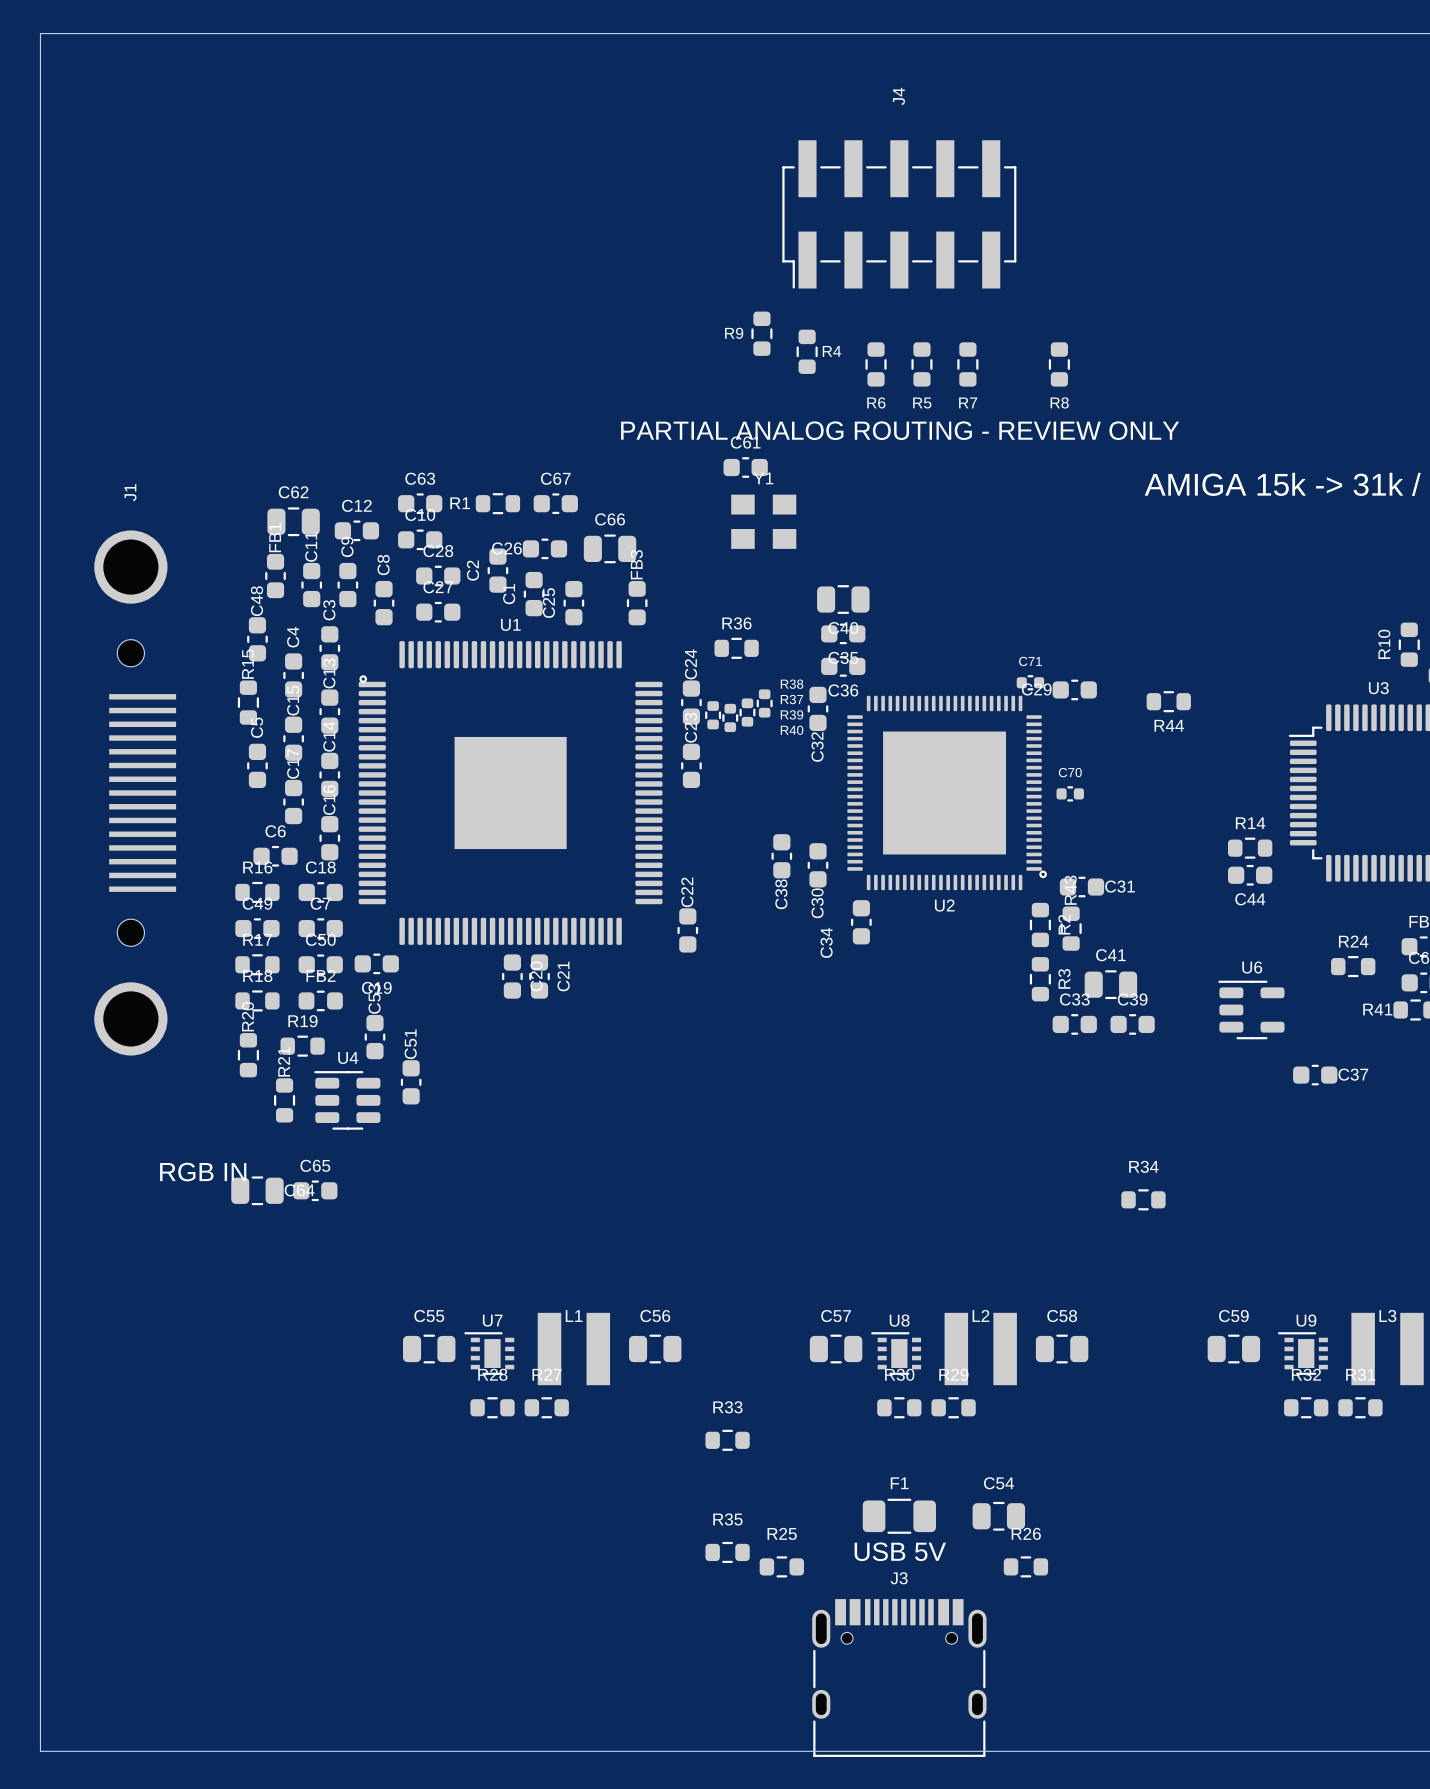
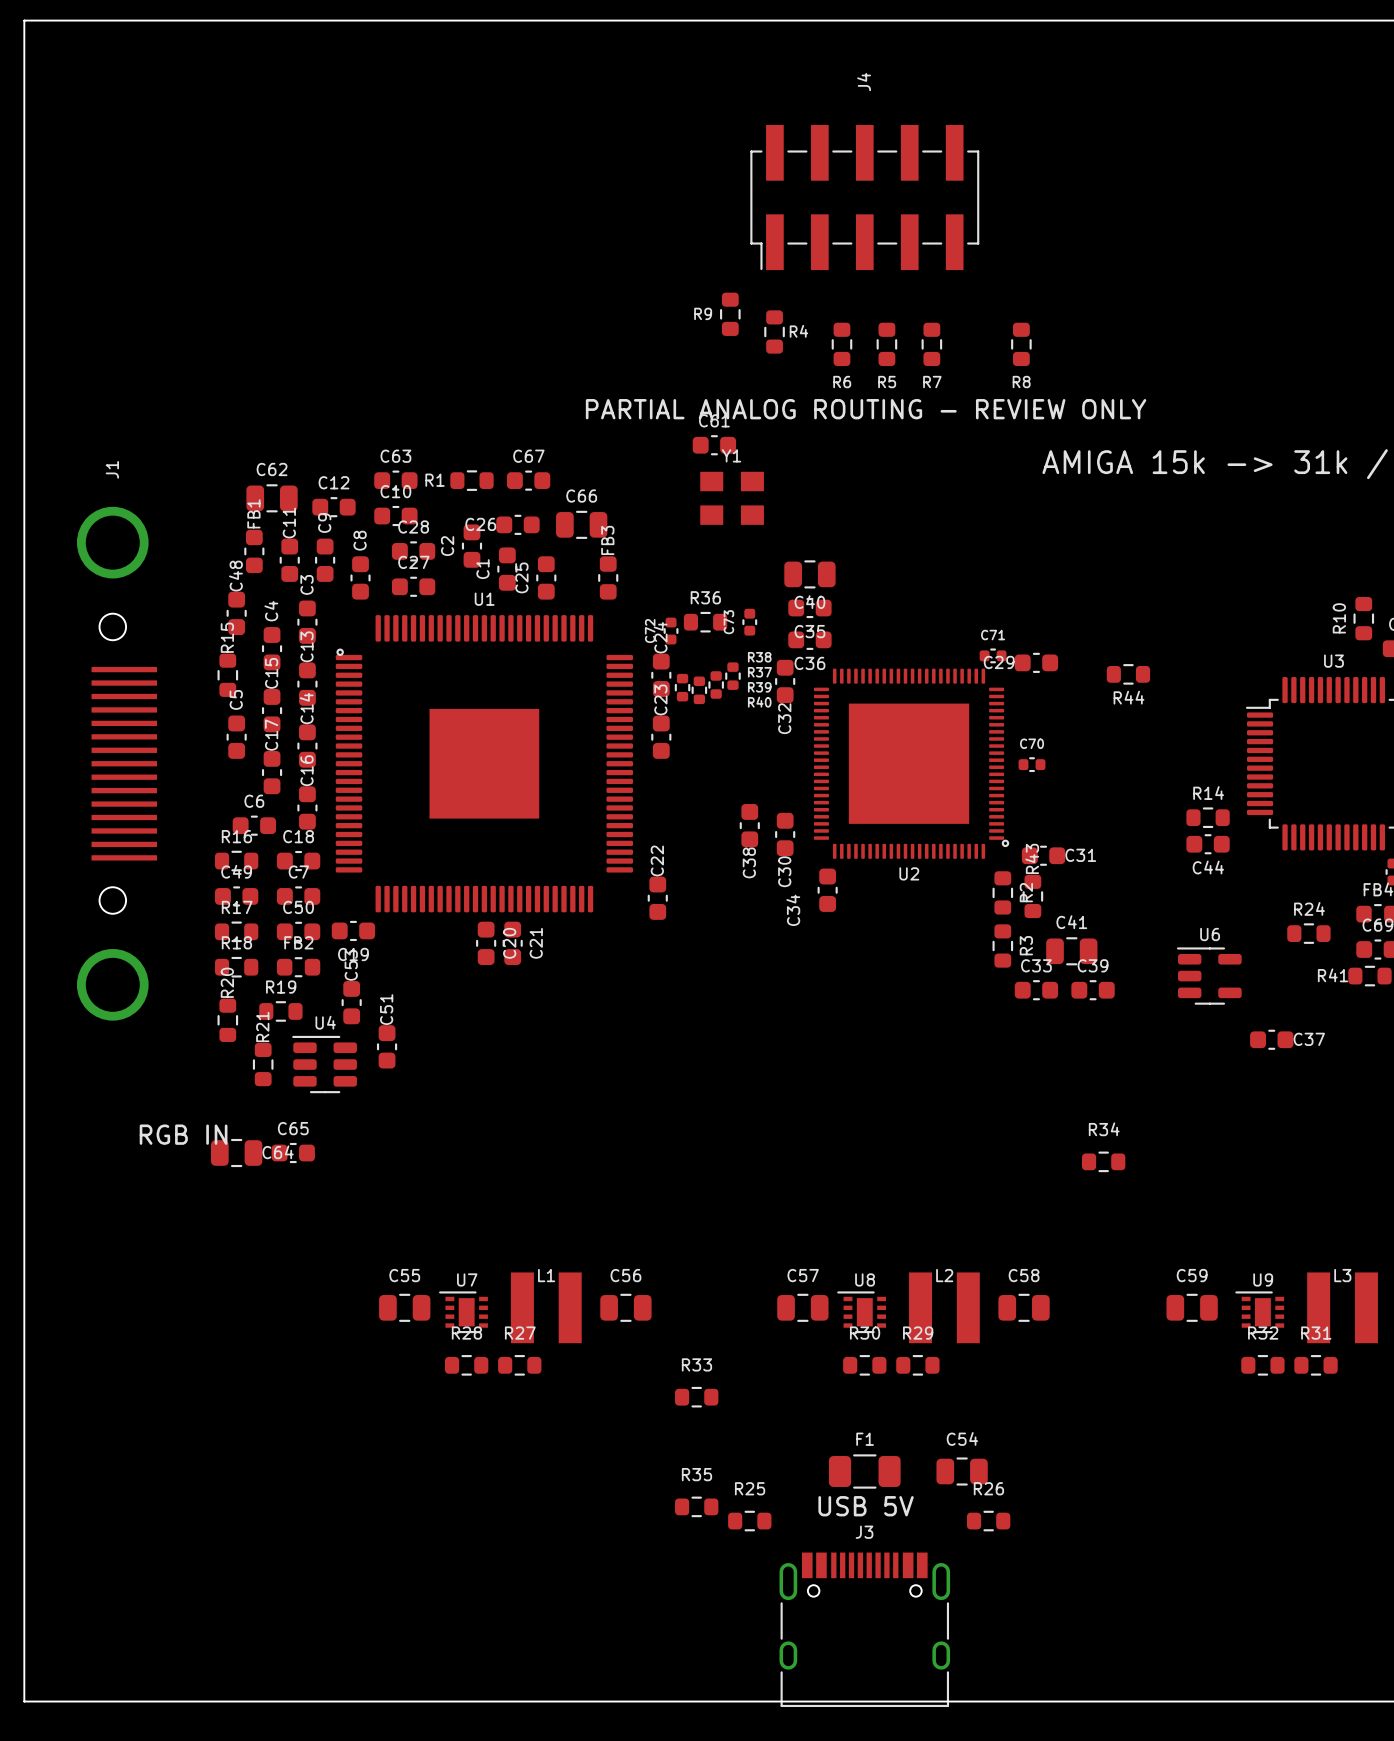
C73: none -> (749, 622)
C72: none -> (671, 631)

